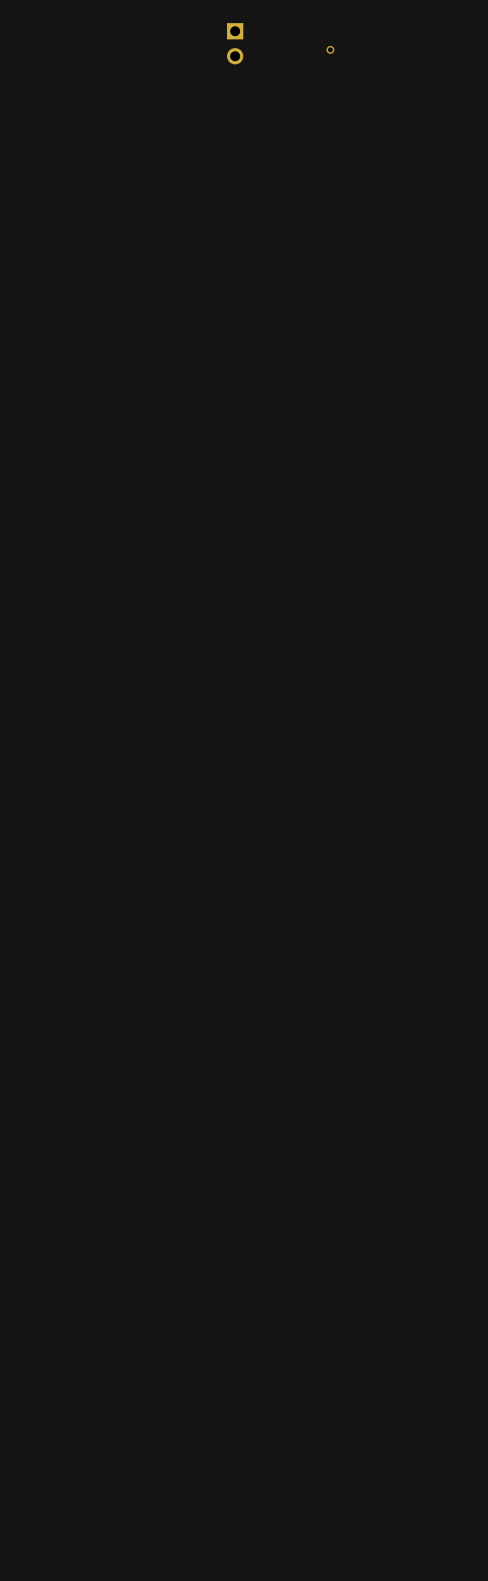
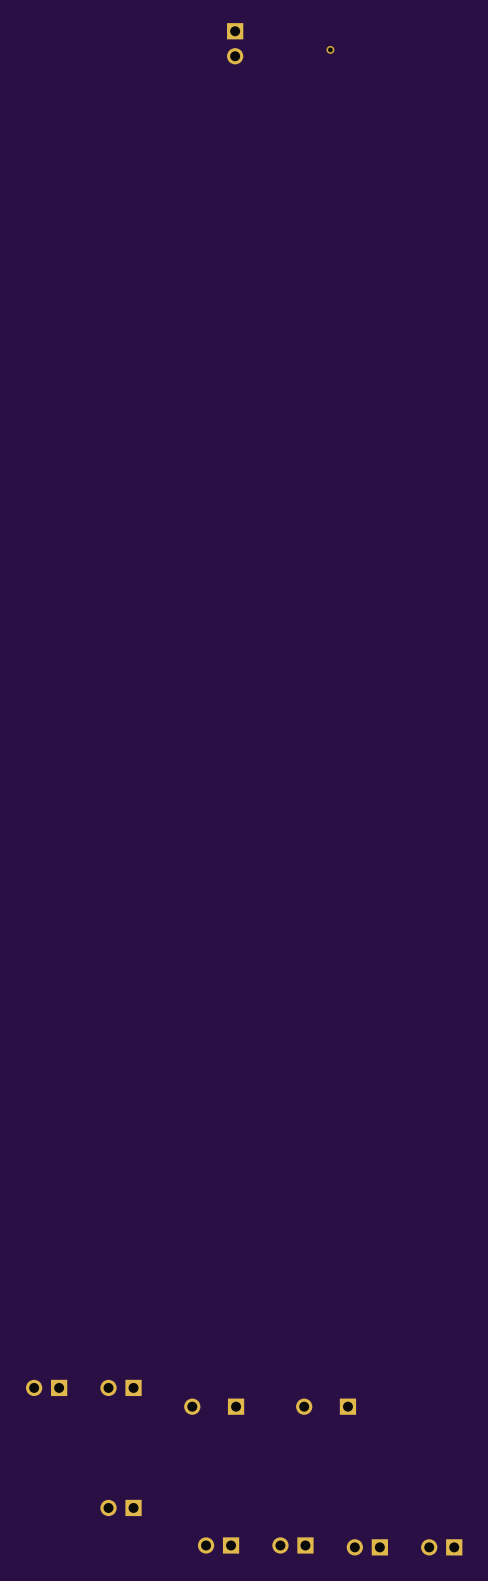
part: none -> (46, 1387)
part: none -> (121, 1387)
part: none -> (214, 1406)
part: none -> (326, 1406)
part: none -> (121, 1507)
part: none -> (218, 1545)
part: none -> (292, 1545)
part: none -> (367, 1547)
part: none -> (441, 1547)

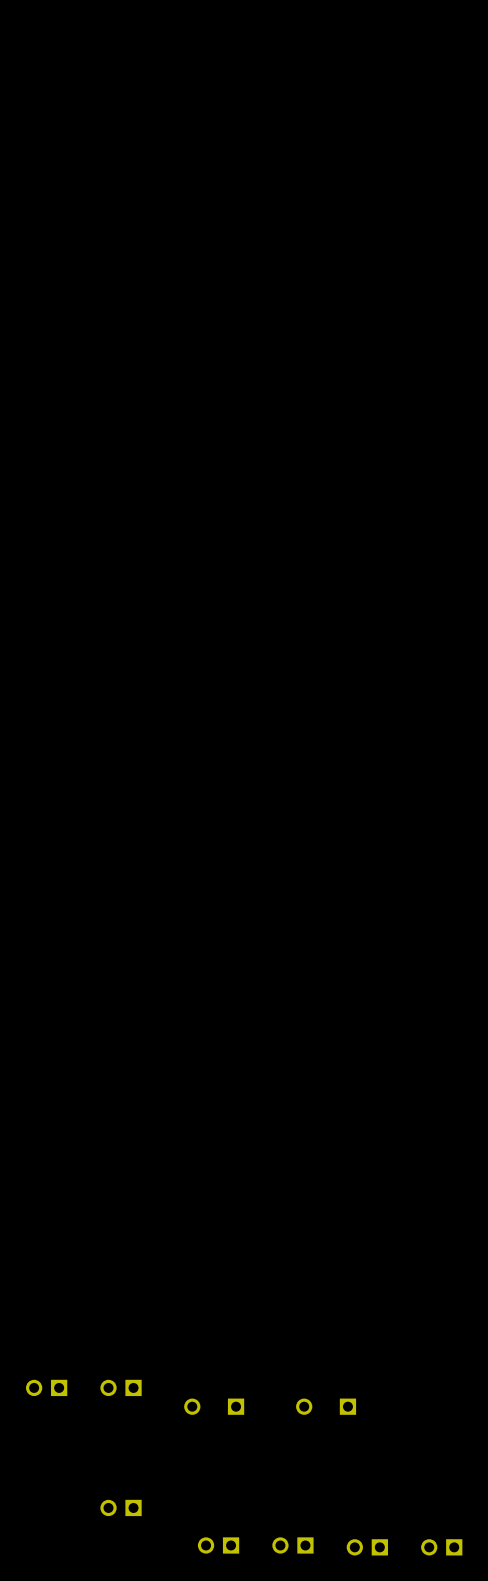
part: (235, 43) -> none
via: (330, 49) -> none

